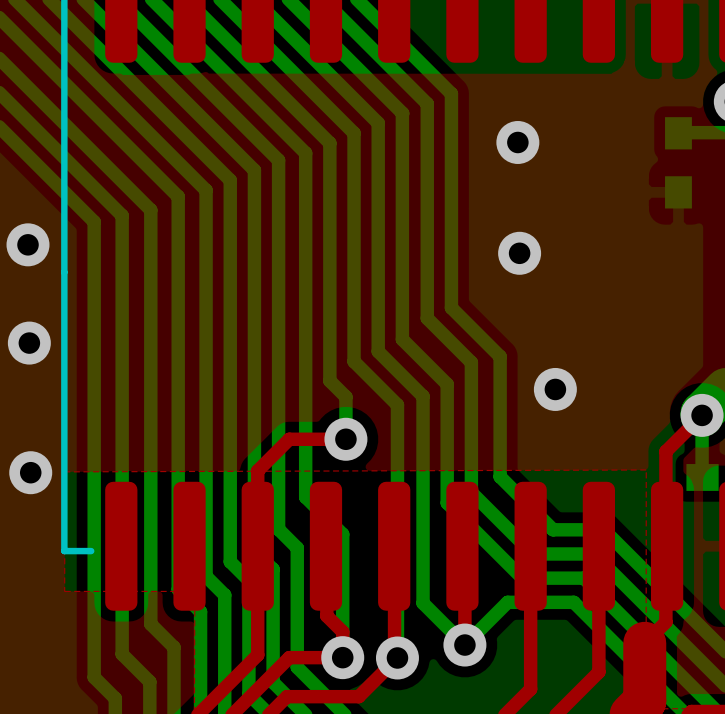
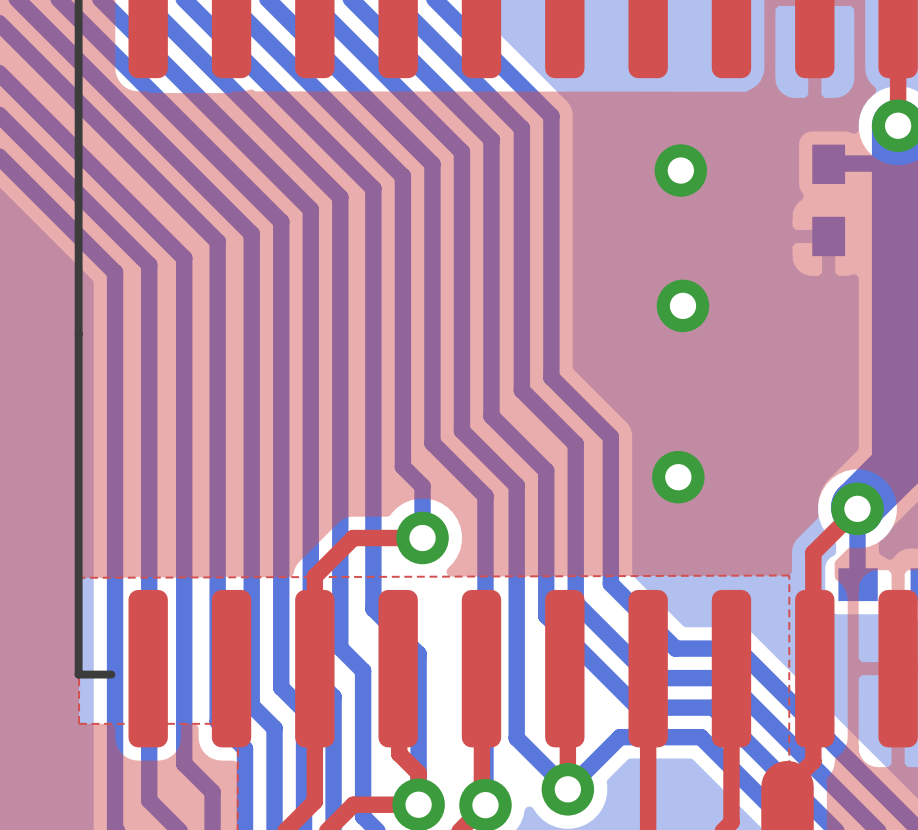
via position: (517, 142) -> (680, 170)
via: (28, 244) -> none
via position: (519, 253) -> (682, 305)
via: (29, 343) -> none
via: (30, 472) -> none

